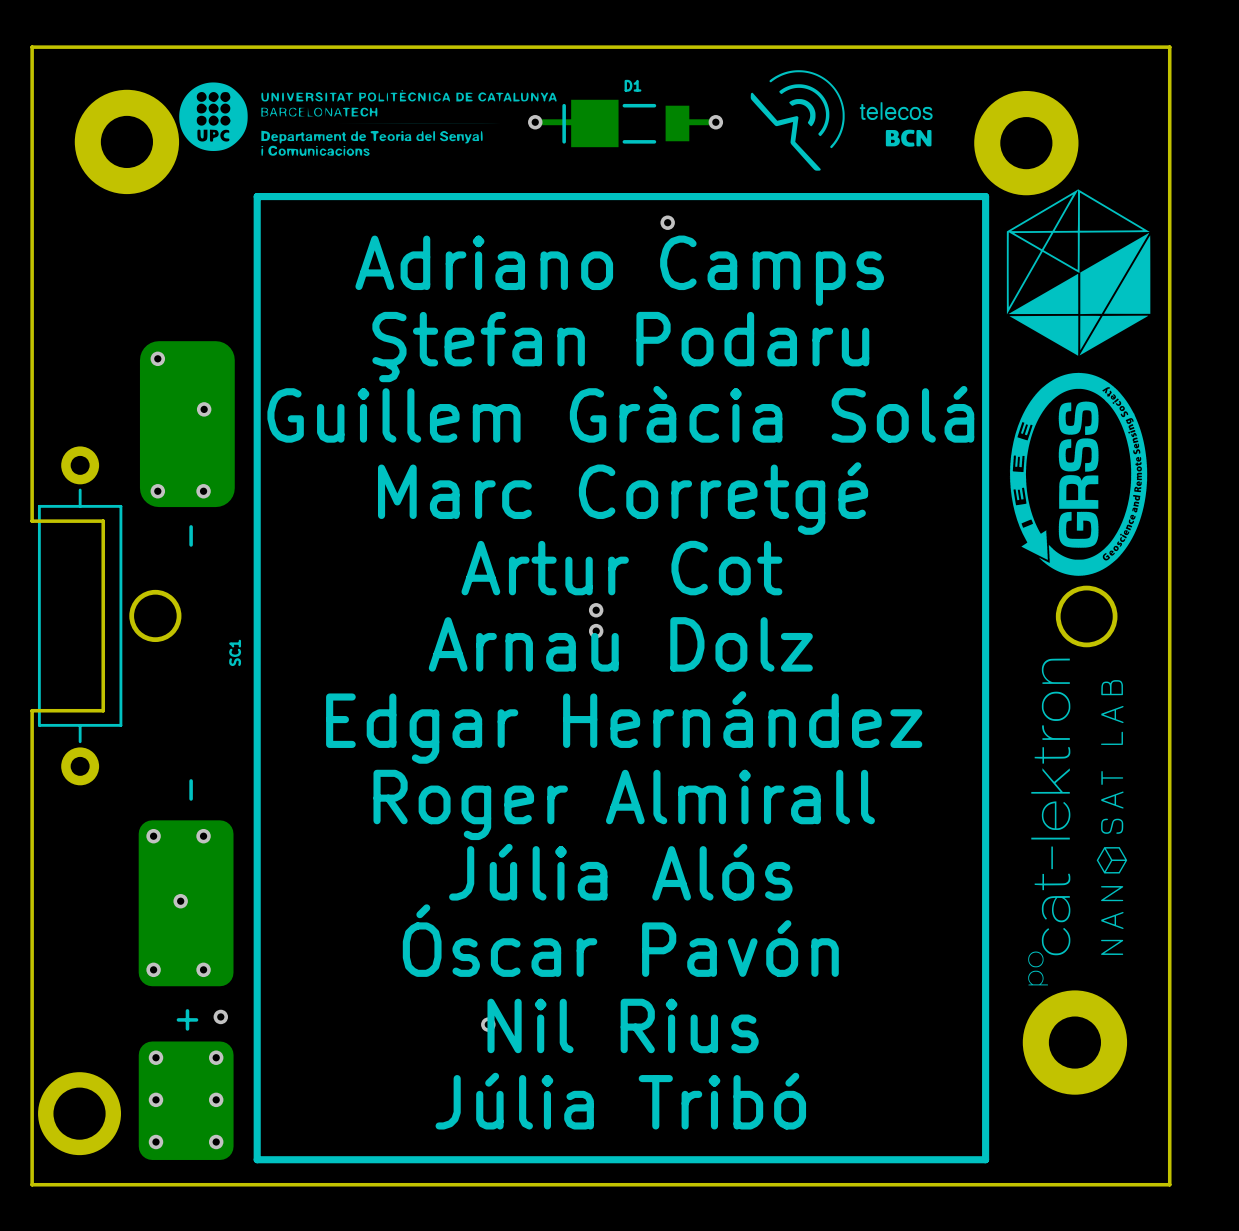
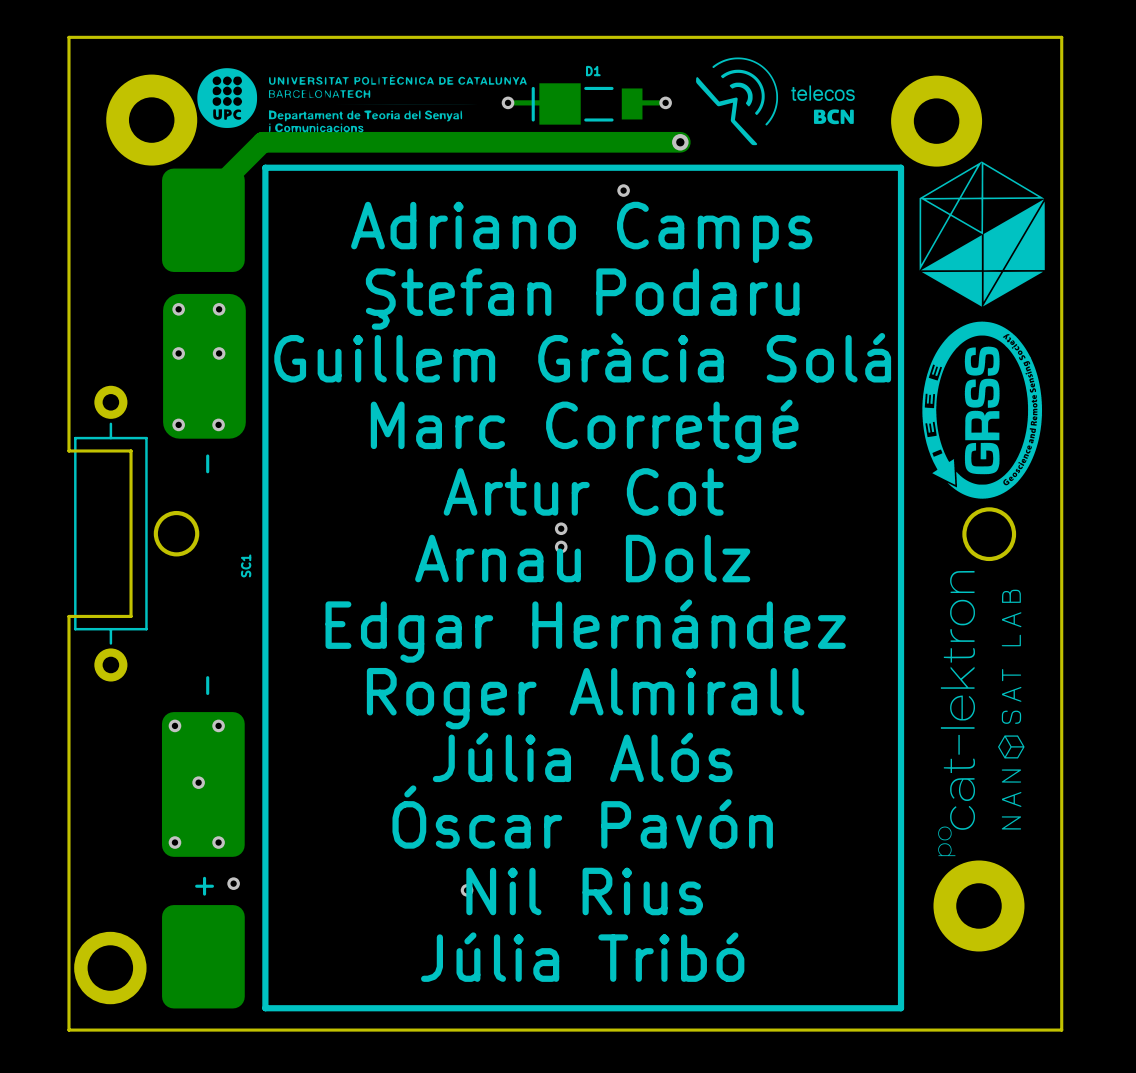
track: none -> (680, 142) (262, 142) (219, 185)
via: none -> (680, 142)
SC1 footprint: [138, 193, 990, 1164] -> [161, 164, 905, 1012]
via: none -> (219, 309)
via: none -> (178, 353)
via: (156, 1057) -> none
via: (216, 1057) -> none
via: (156, 1099) -> none
via: (216, 1099) -> none
via: (156, 1142) -> none
via: (216, 1142) -> none

